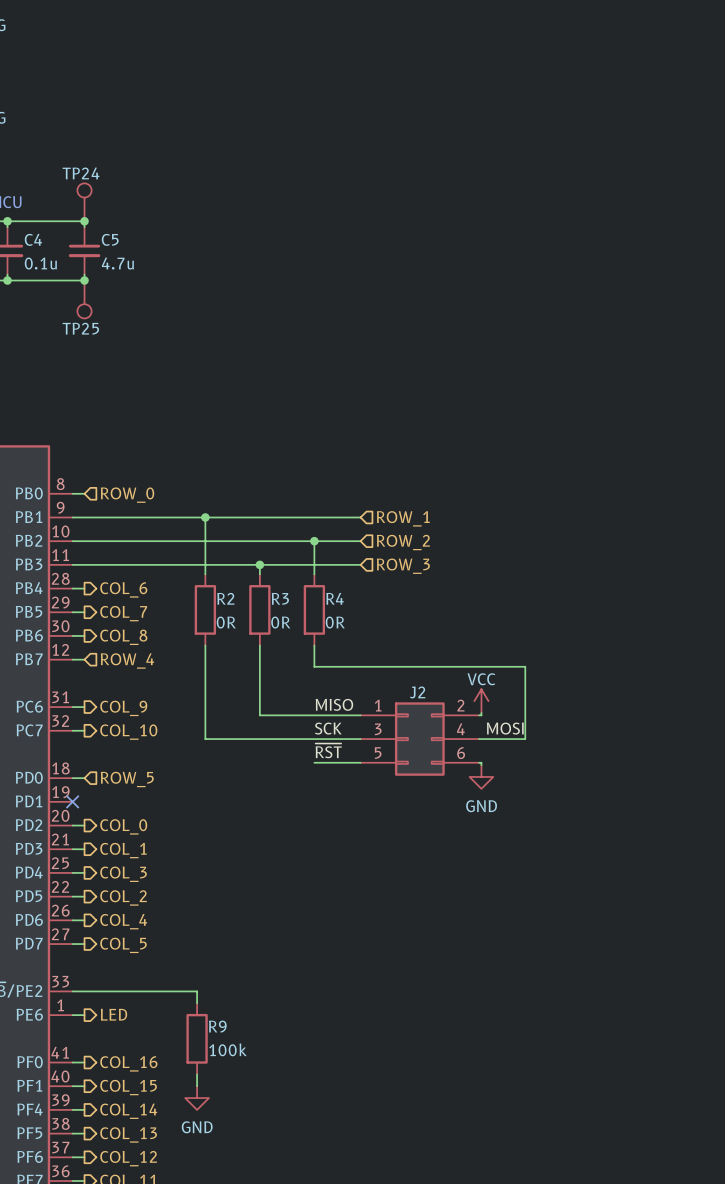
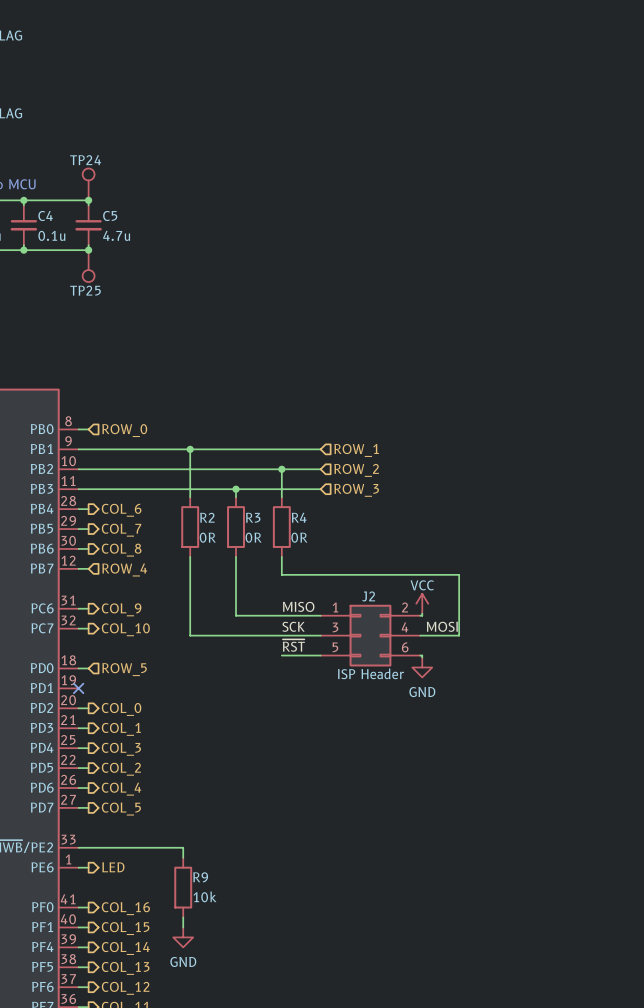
J2 value: none -> ISP Header (371, 673)
R9 value: 100k (228, 1049) -> 10k (204, 896)

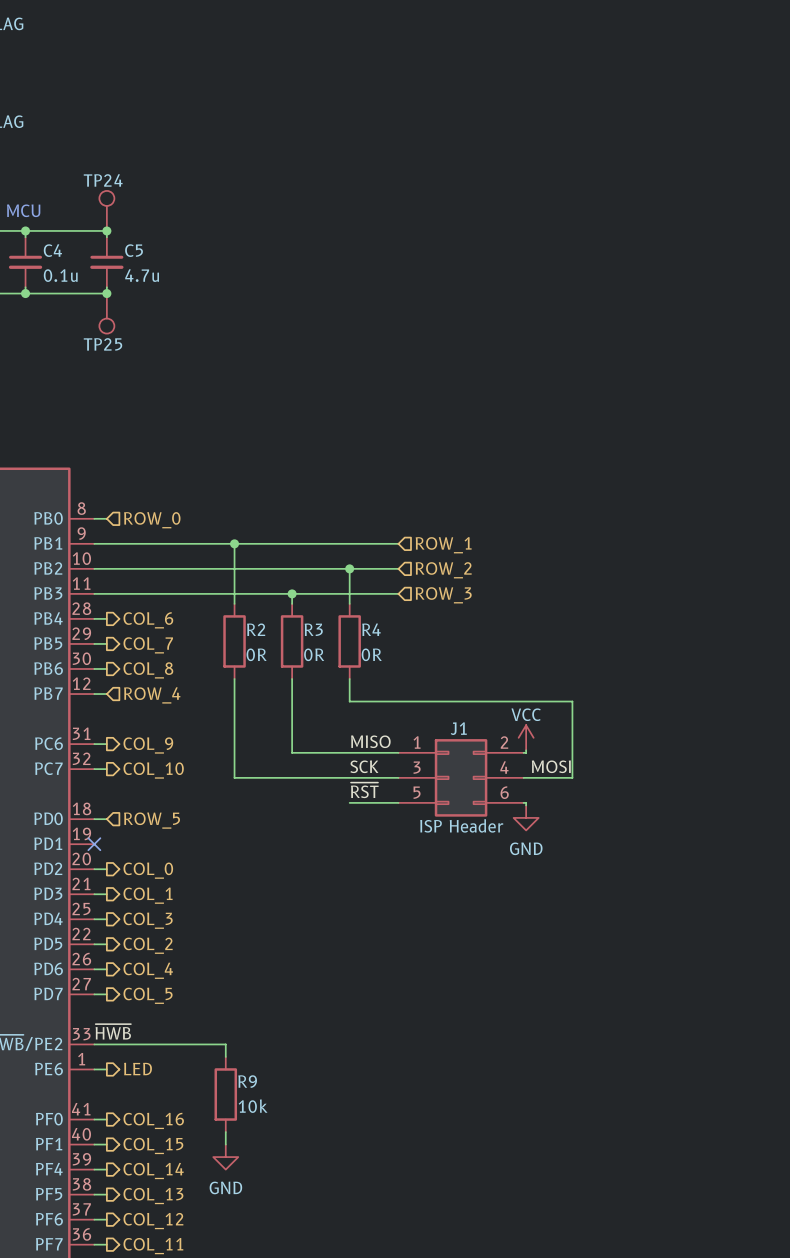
J2 name: J2 (368, 596) -> J1 (458, 728)
label: none -> ~{HWB} (113, 1031)

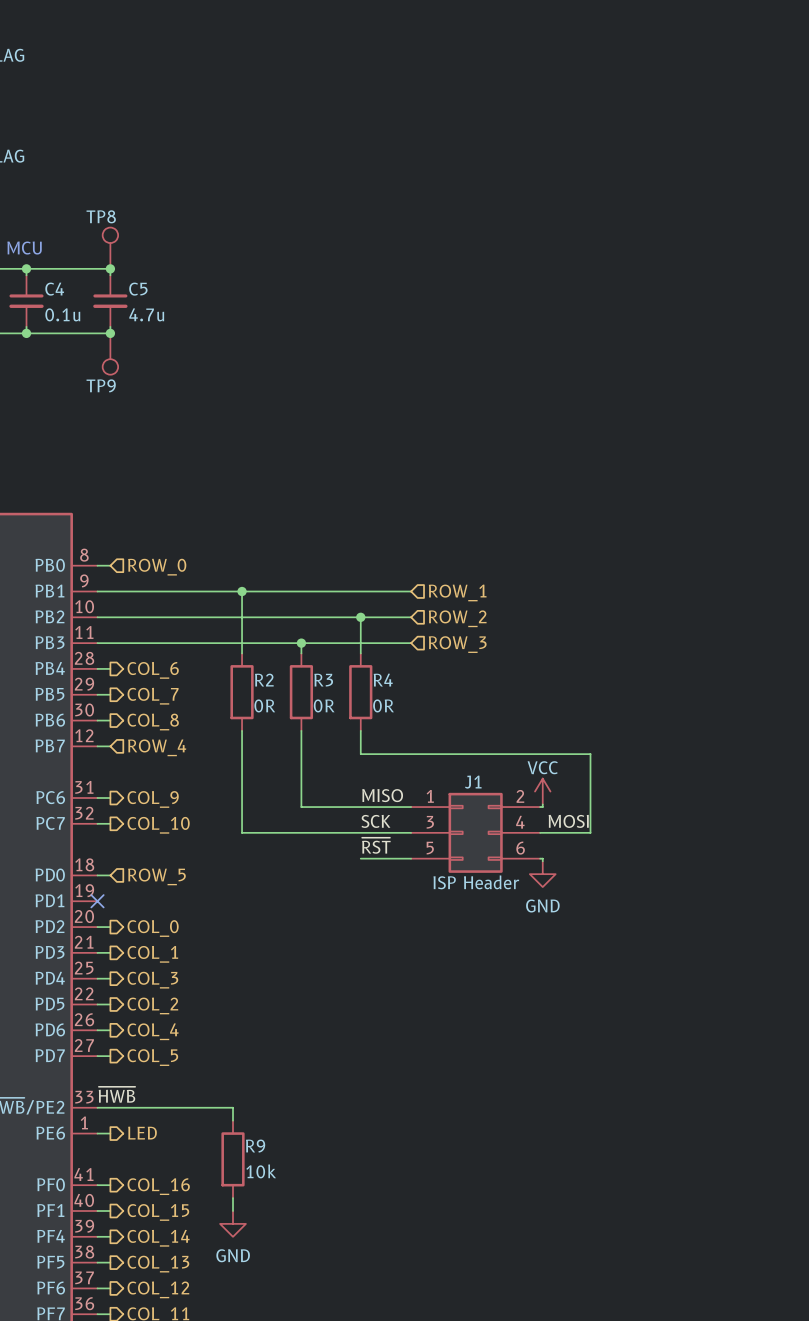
TP24 name: TP24 (103, 180) -> TP8 (101, 216)
TP25 name: TP25 (102, 344) -> TP9 (101, 385)

